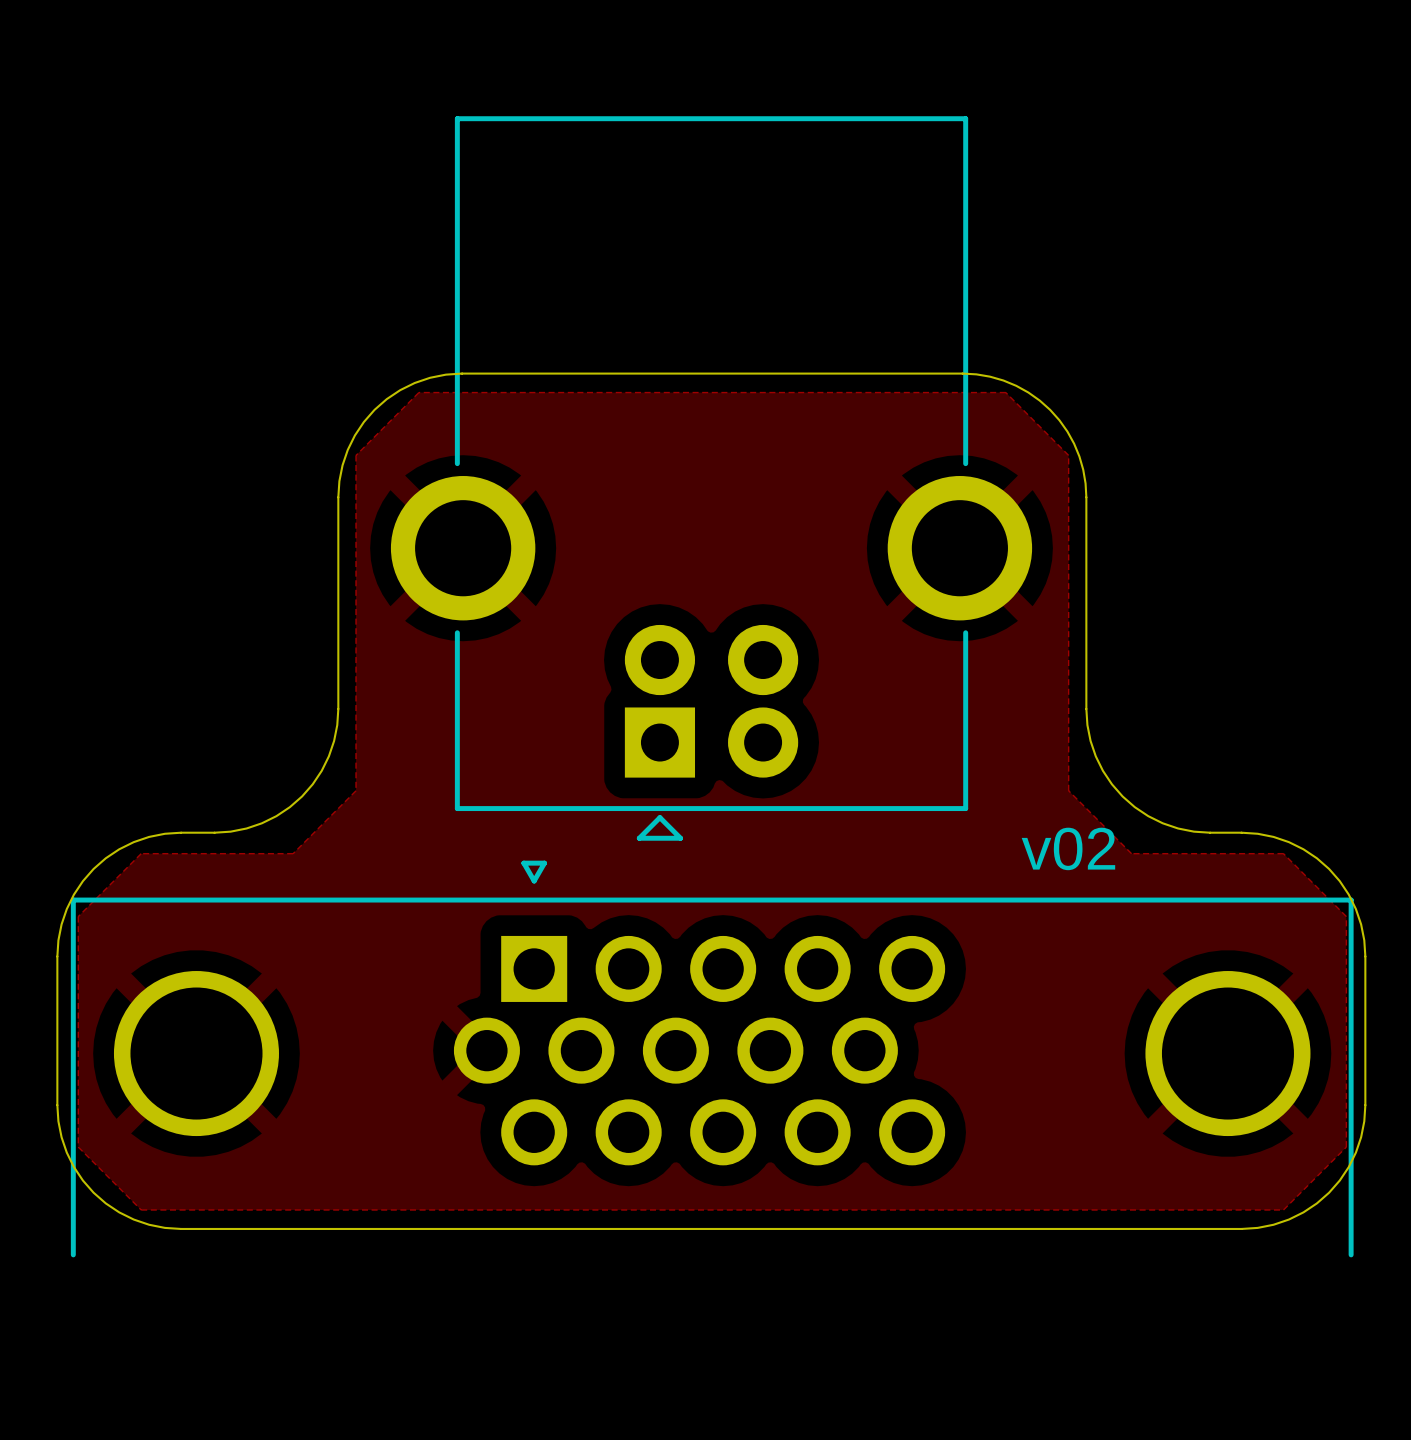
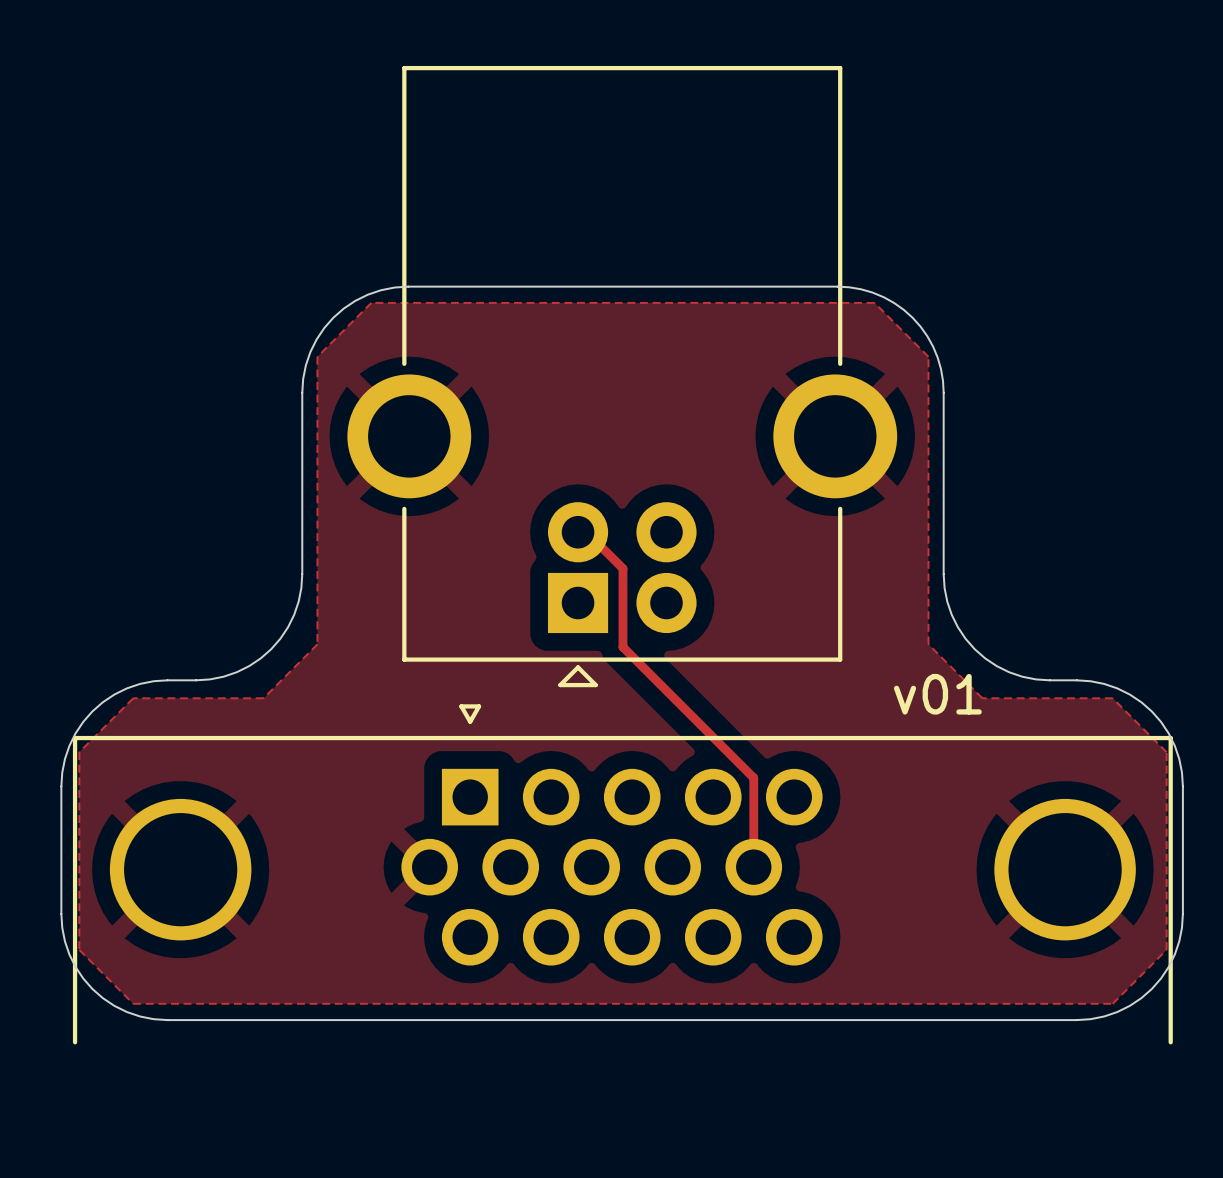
track: none -> (574, 532) (586, 532) (622, 568) (622, 647) (753, 777) (753, 867)
text: v02 (1068, 848) -> v01 (937, 694)

